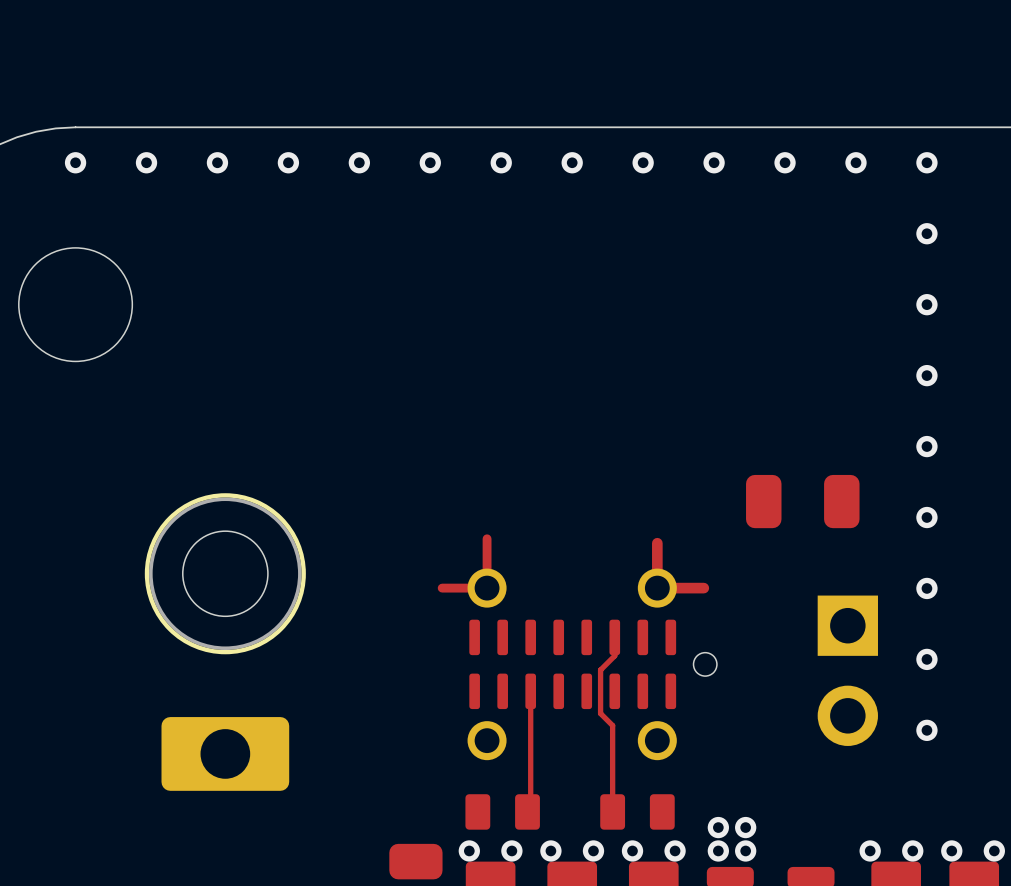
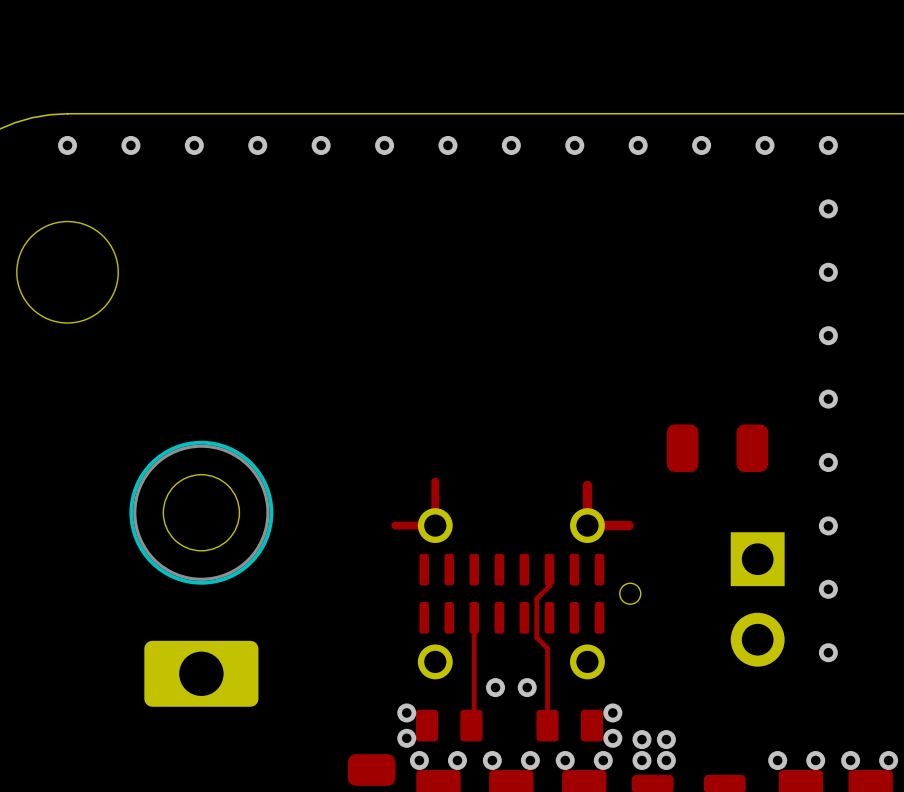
via: none -> (495, 687)
via: none -> (527, 687)
via: none -> (406, 712)
via: none -> (612, 712)
via: none -> (406, 738)
via: none -> (612, 738)

